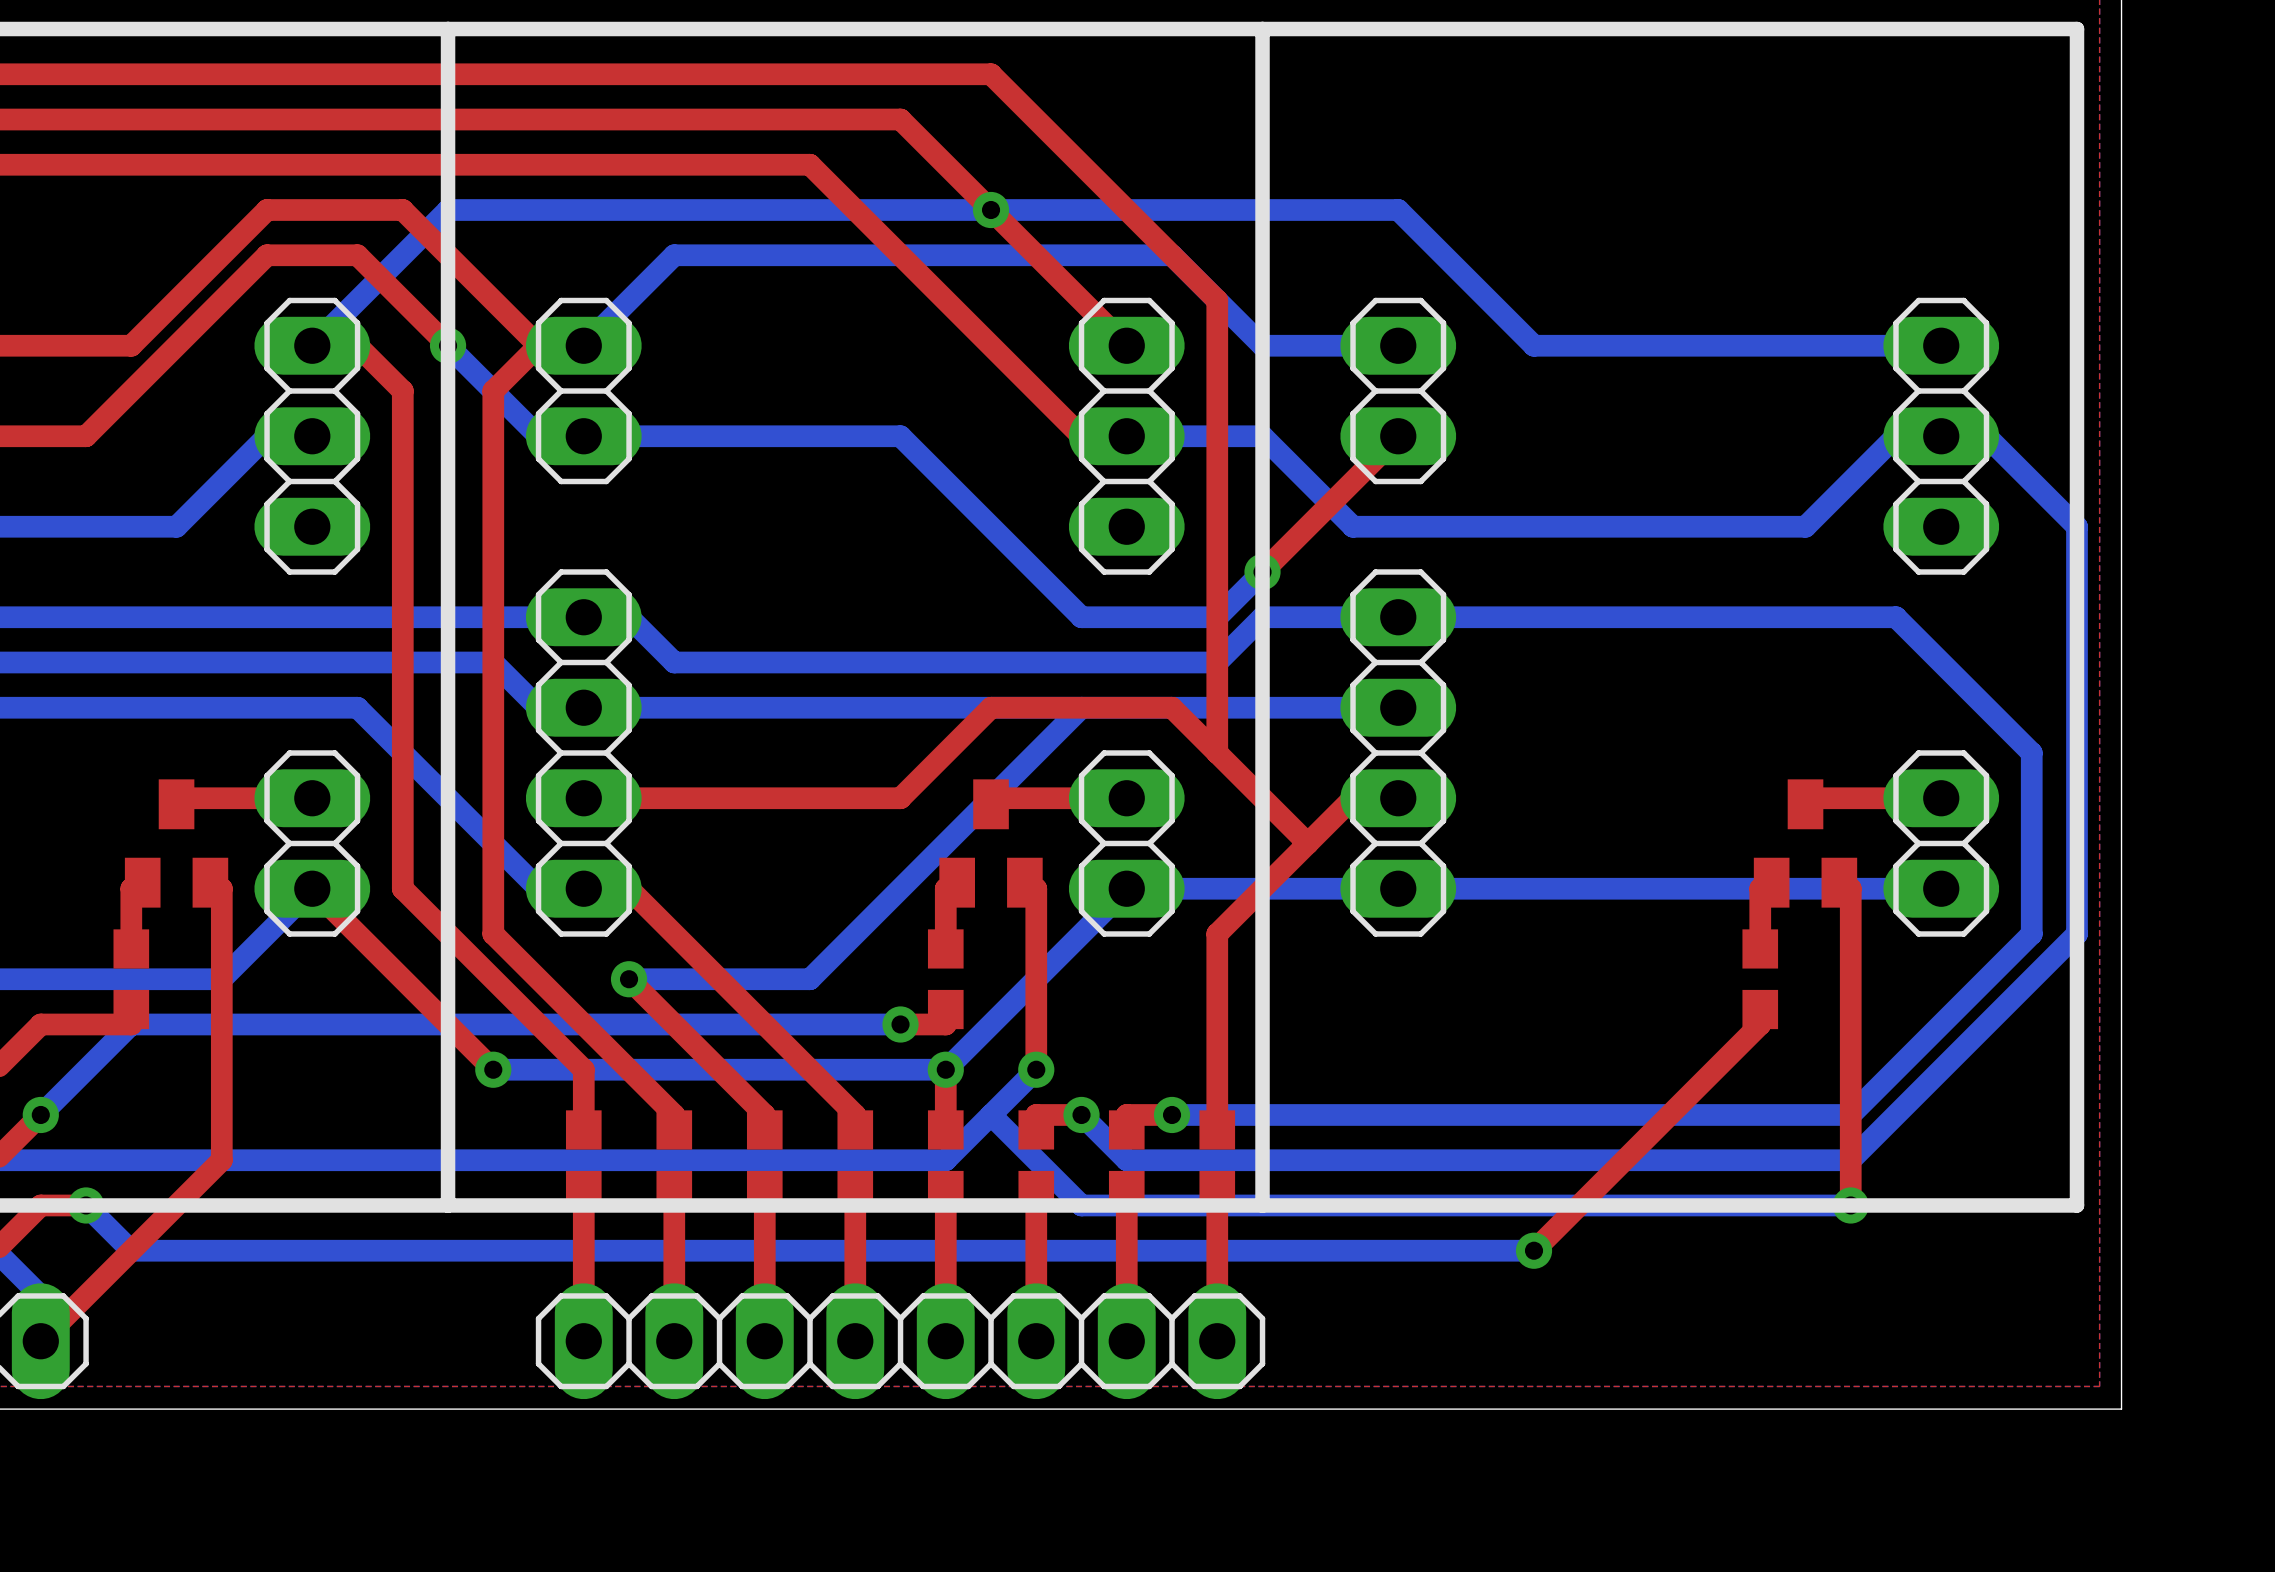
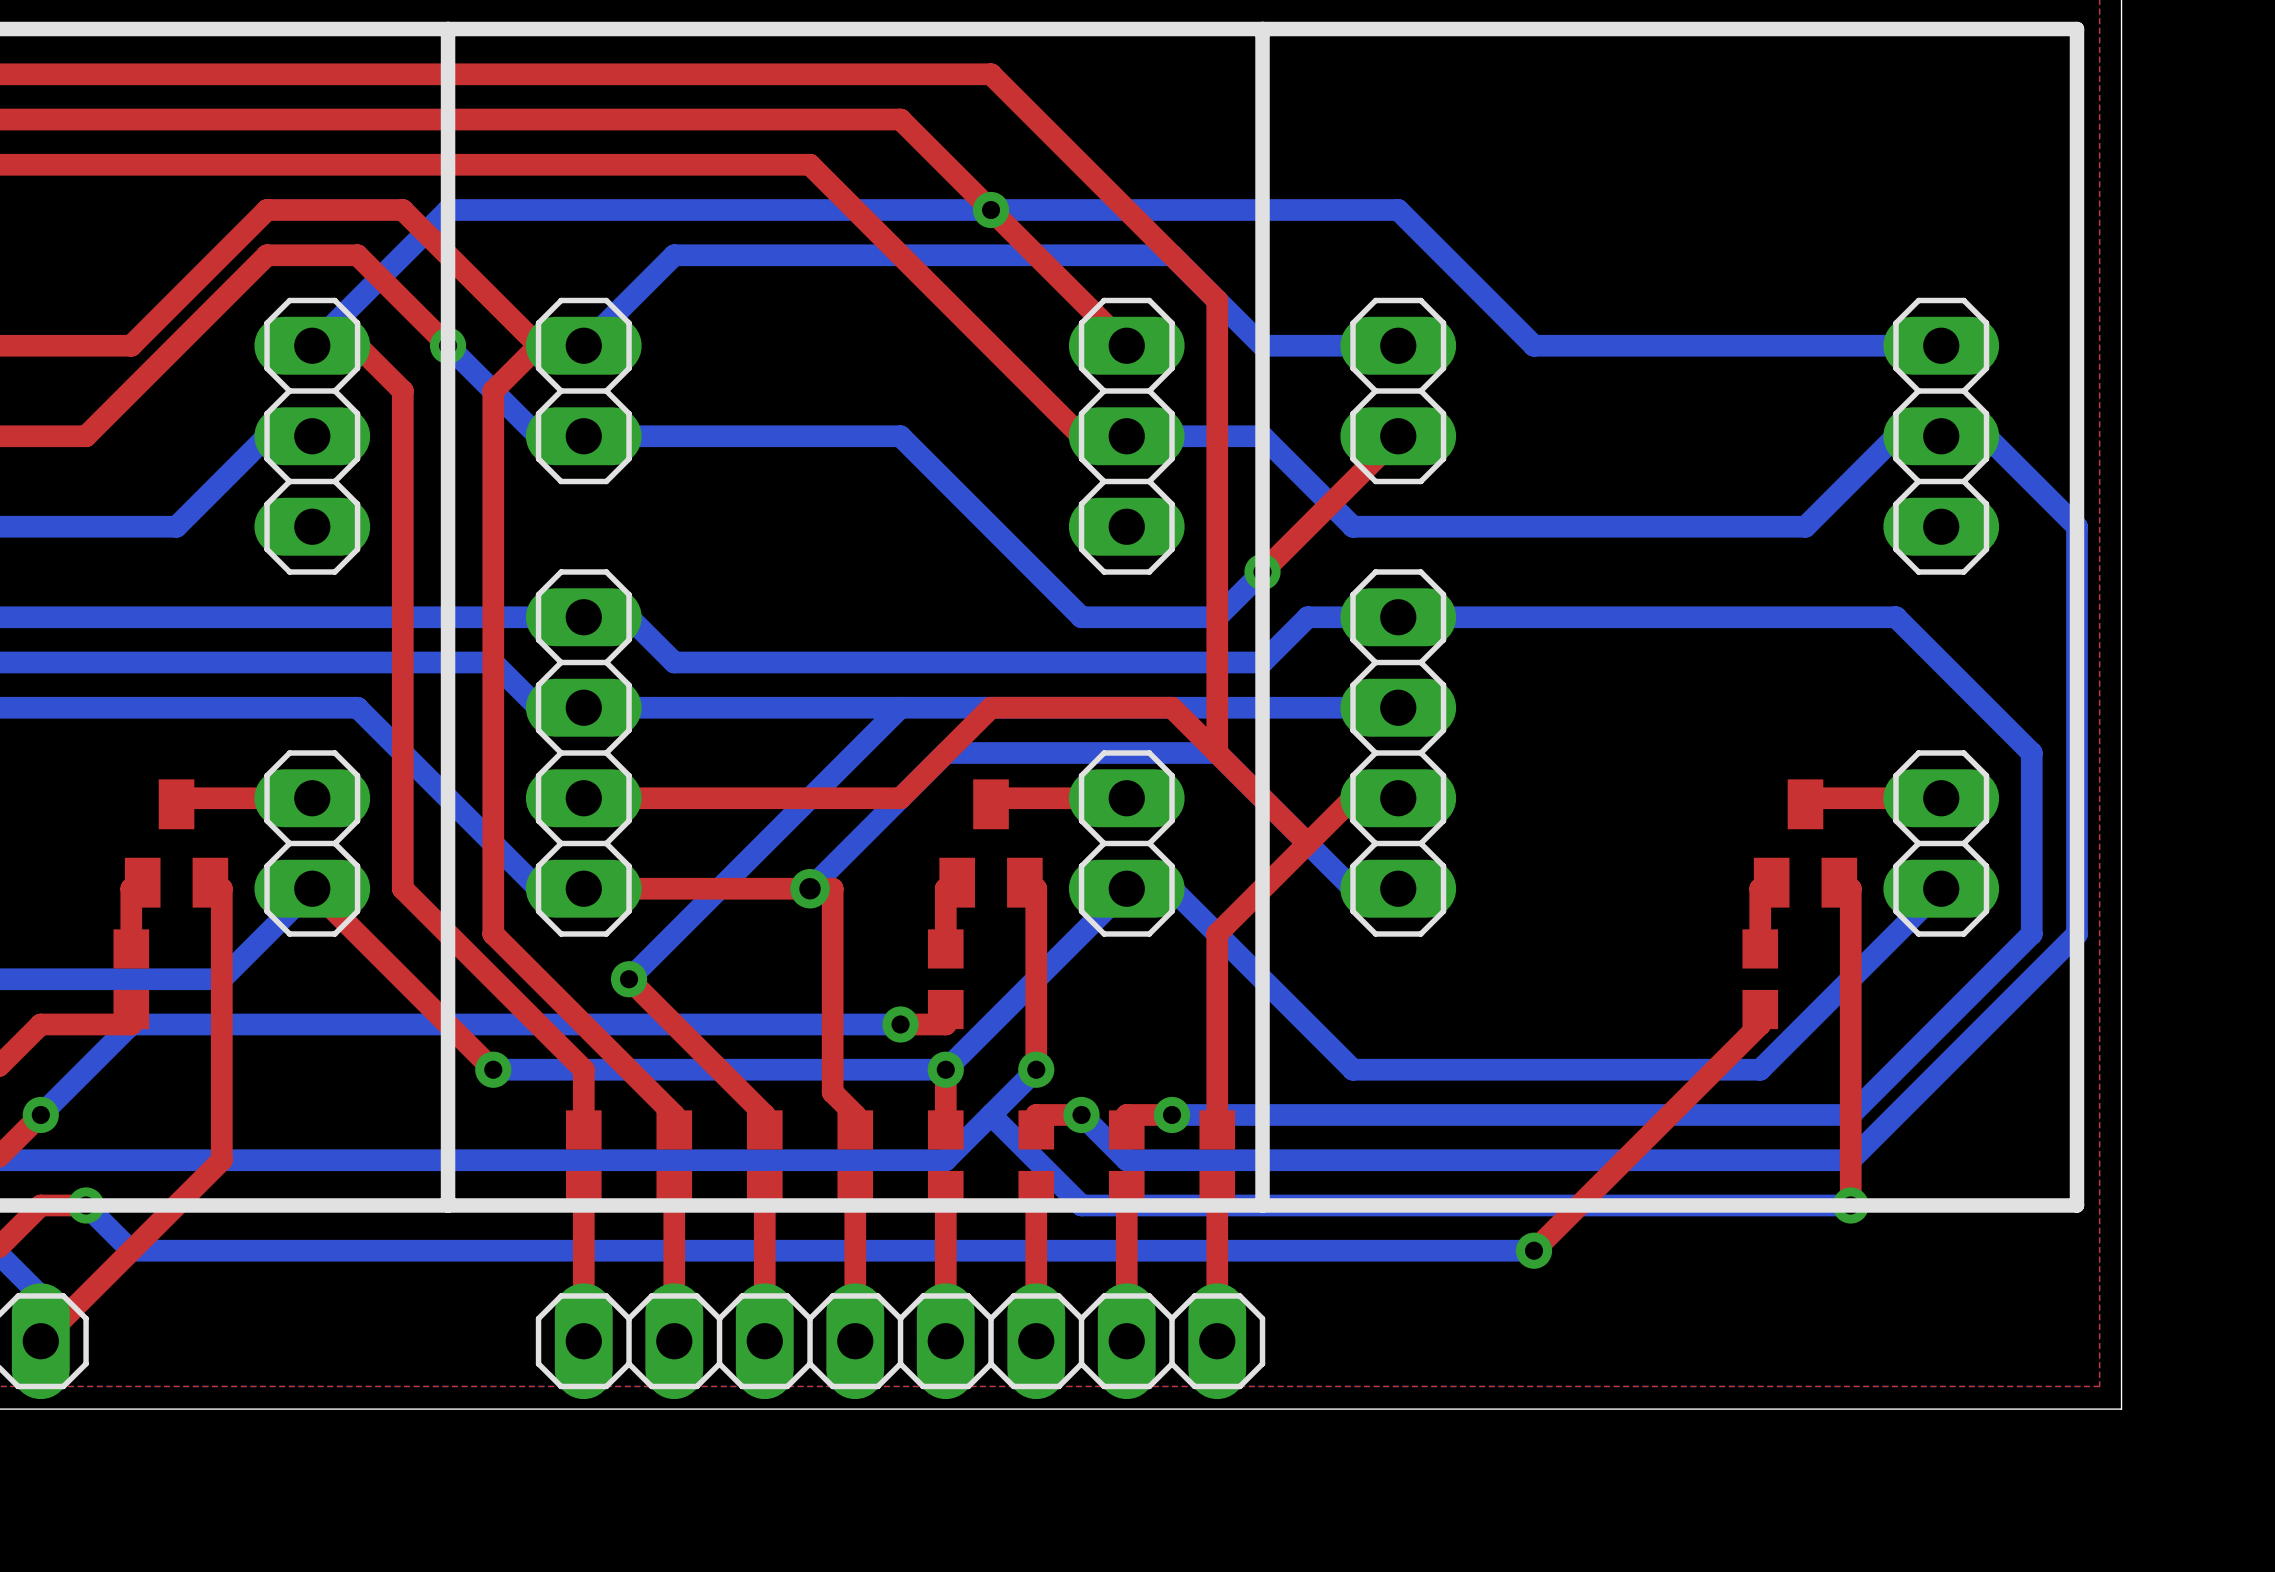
bottom track: (1307, 617) (1262, 617) (1217, 662) -> (1307, 617) (1262, 662) (1217, 662)
bottom track: (1081, 707) (810, 979) (629, 979) -> (900, 707) (629, 979)
top track: (629, 888) (832, 1092) -> (629, 888) (832, 888) (832, 1092)
via: none -> (810, 888)
bottom track: (1172, 888) (1353, 888) -> (810, 888) (945, 752) (1217, 752) (1353, 888)
bottom track: (1398, 888) (1941, 888) -> (1172, 888) (1353, 1069) (1760, 1069) (1941, 888)

